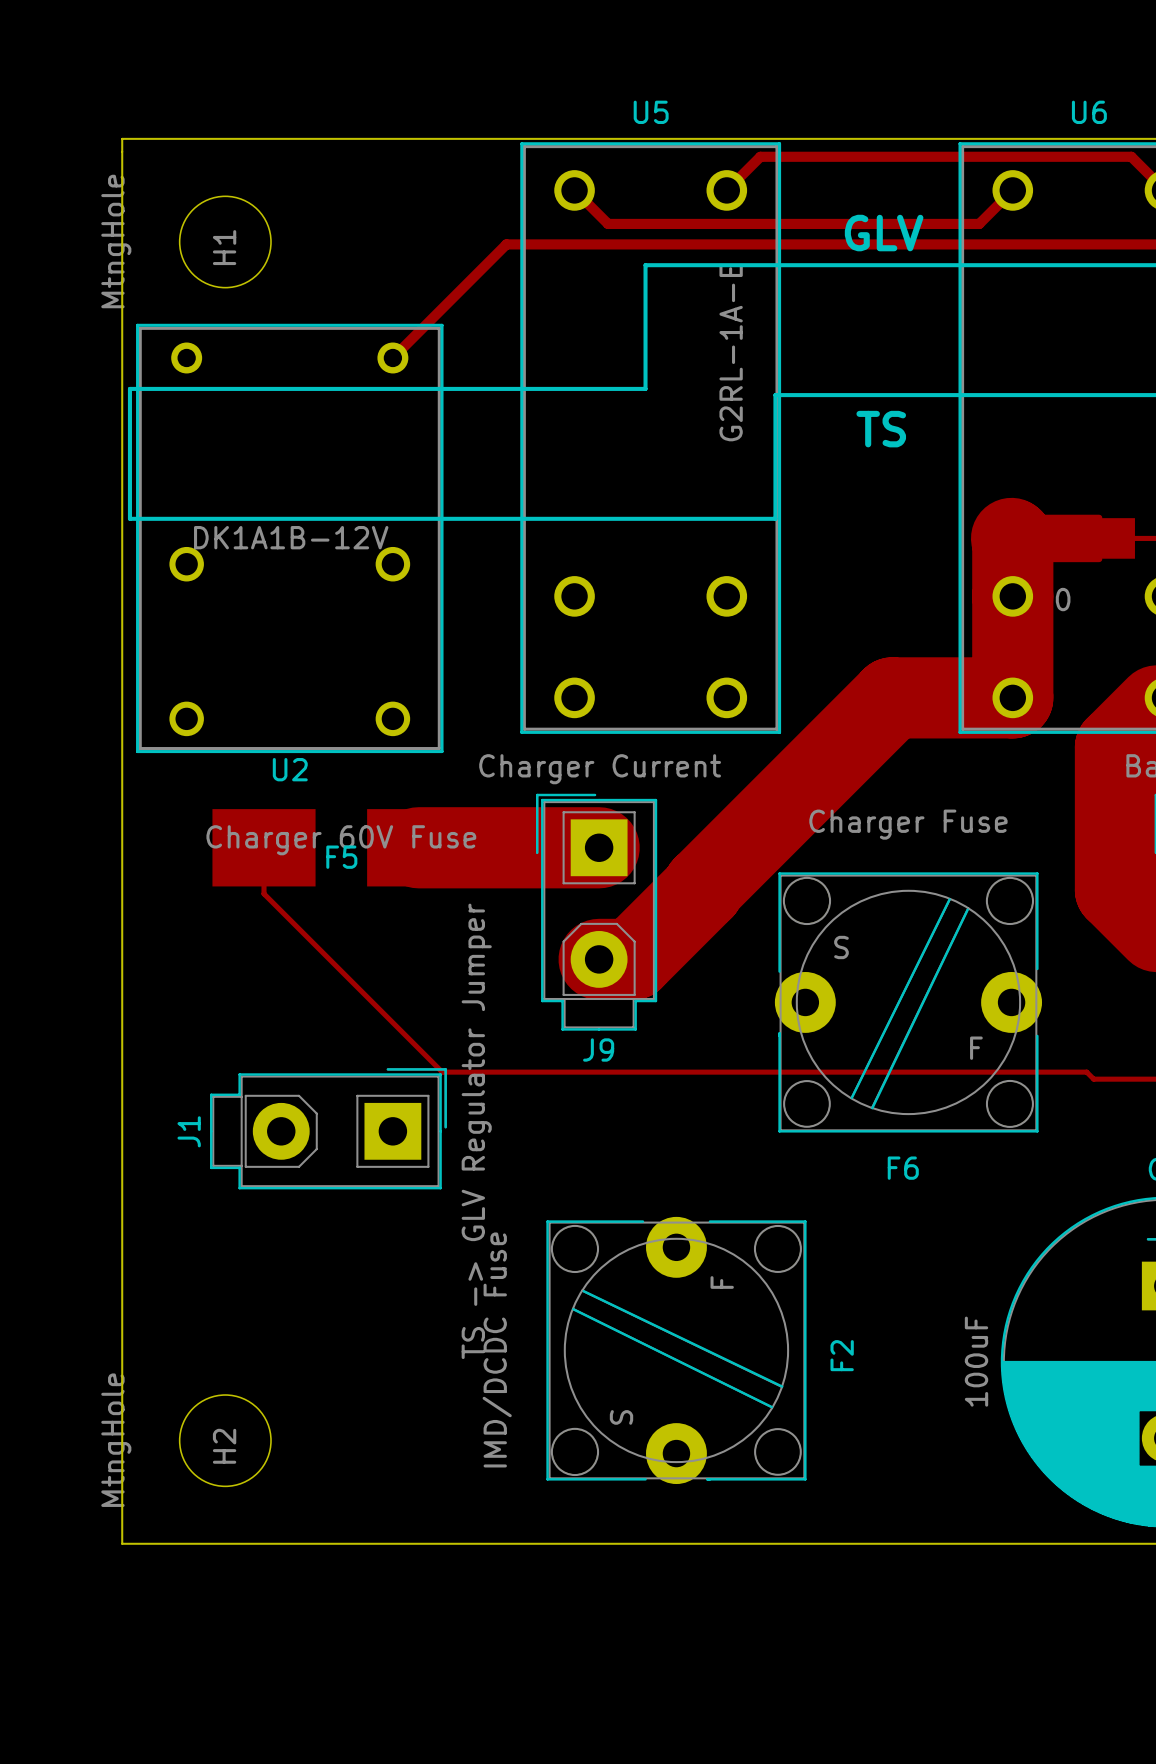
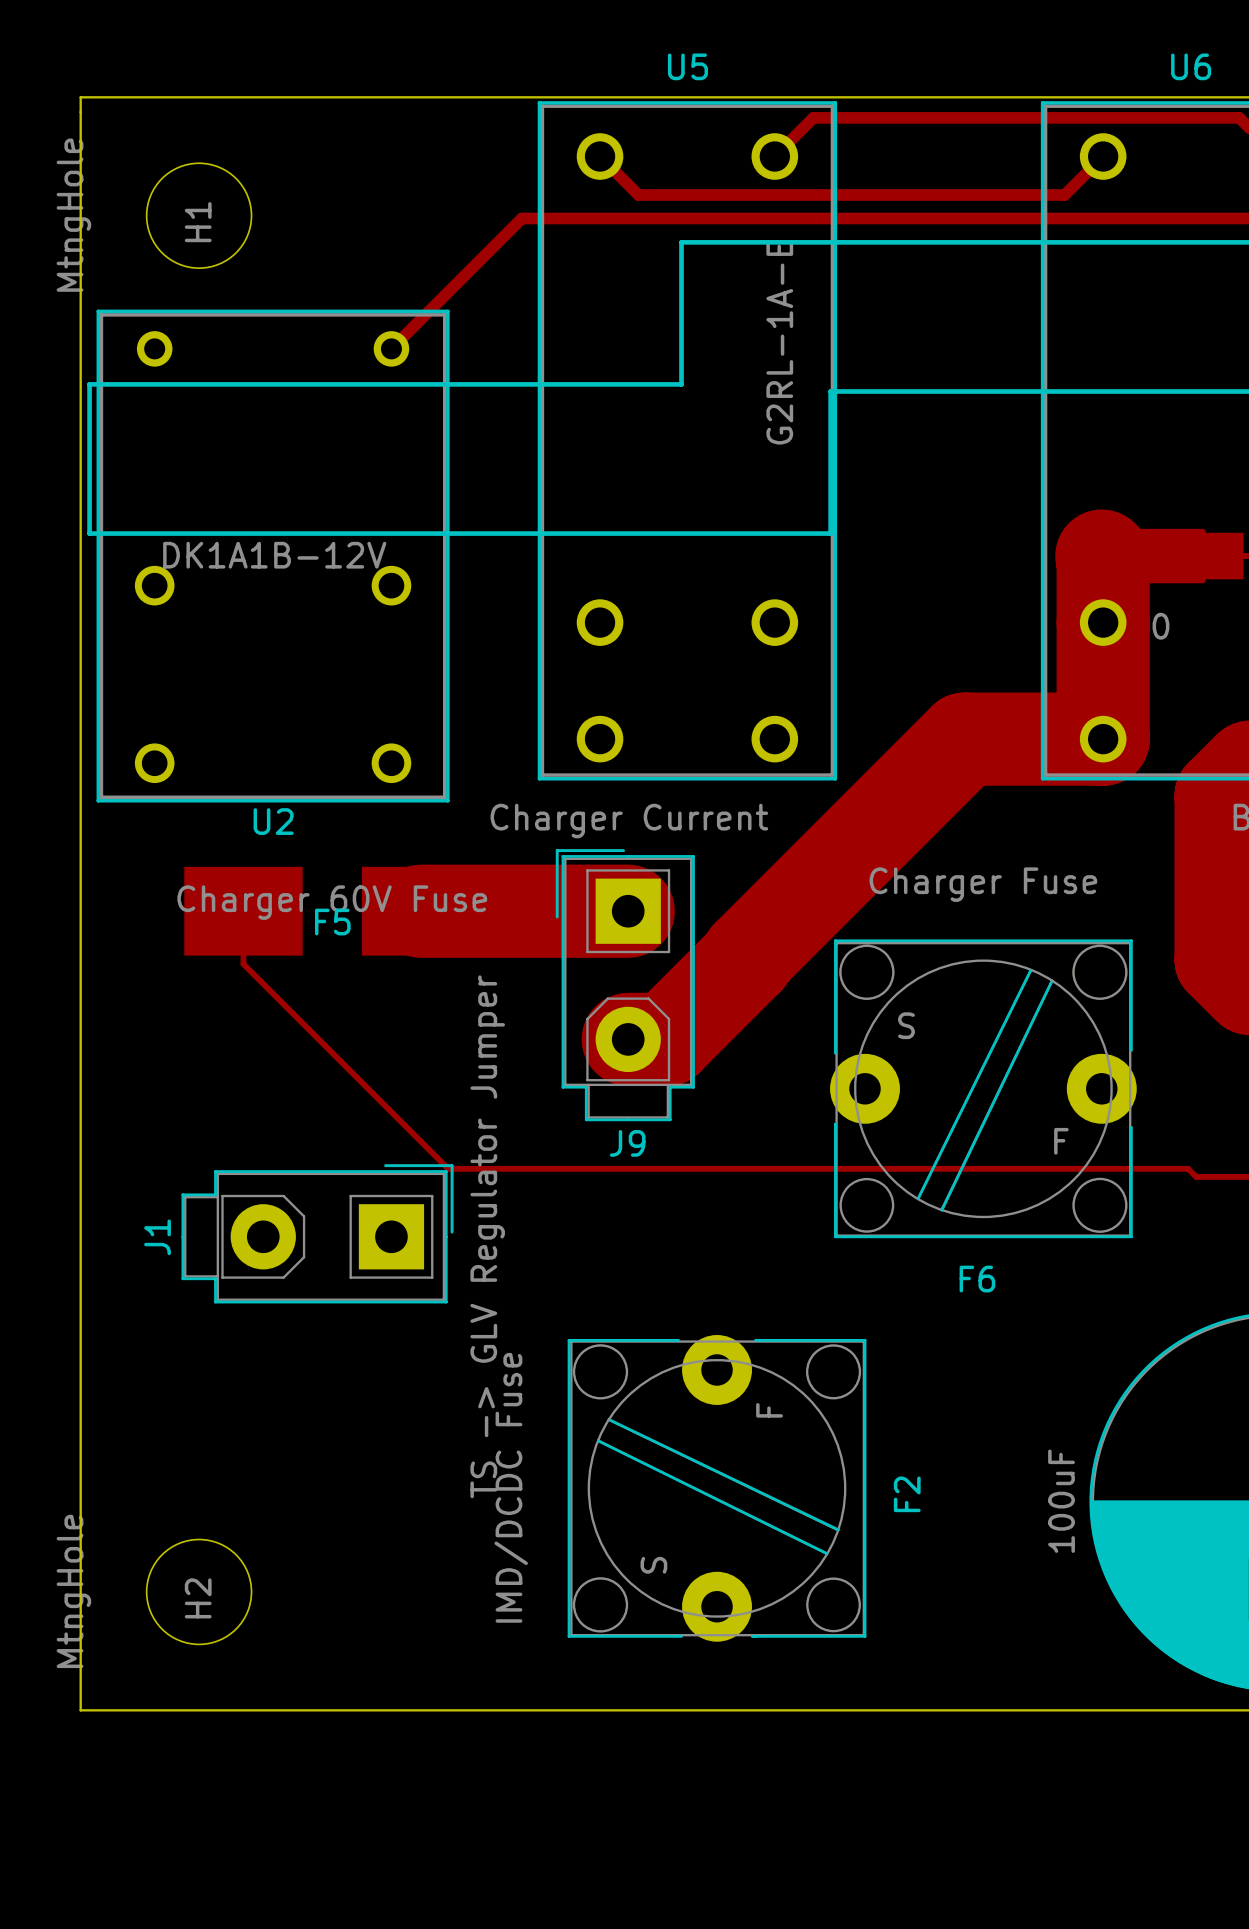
text: GLV (884, 233) -> none
text: TS (881, 429) -> none

